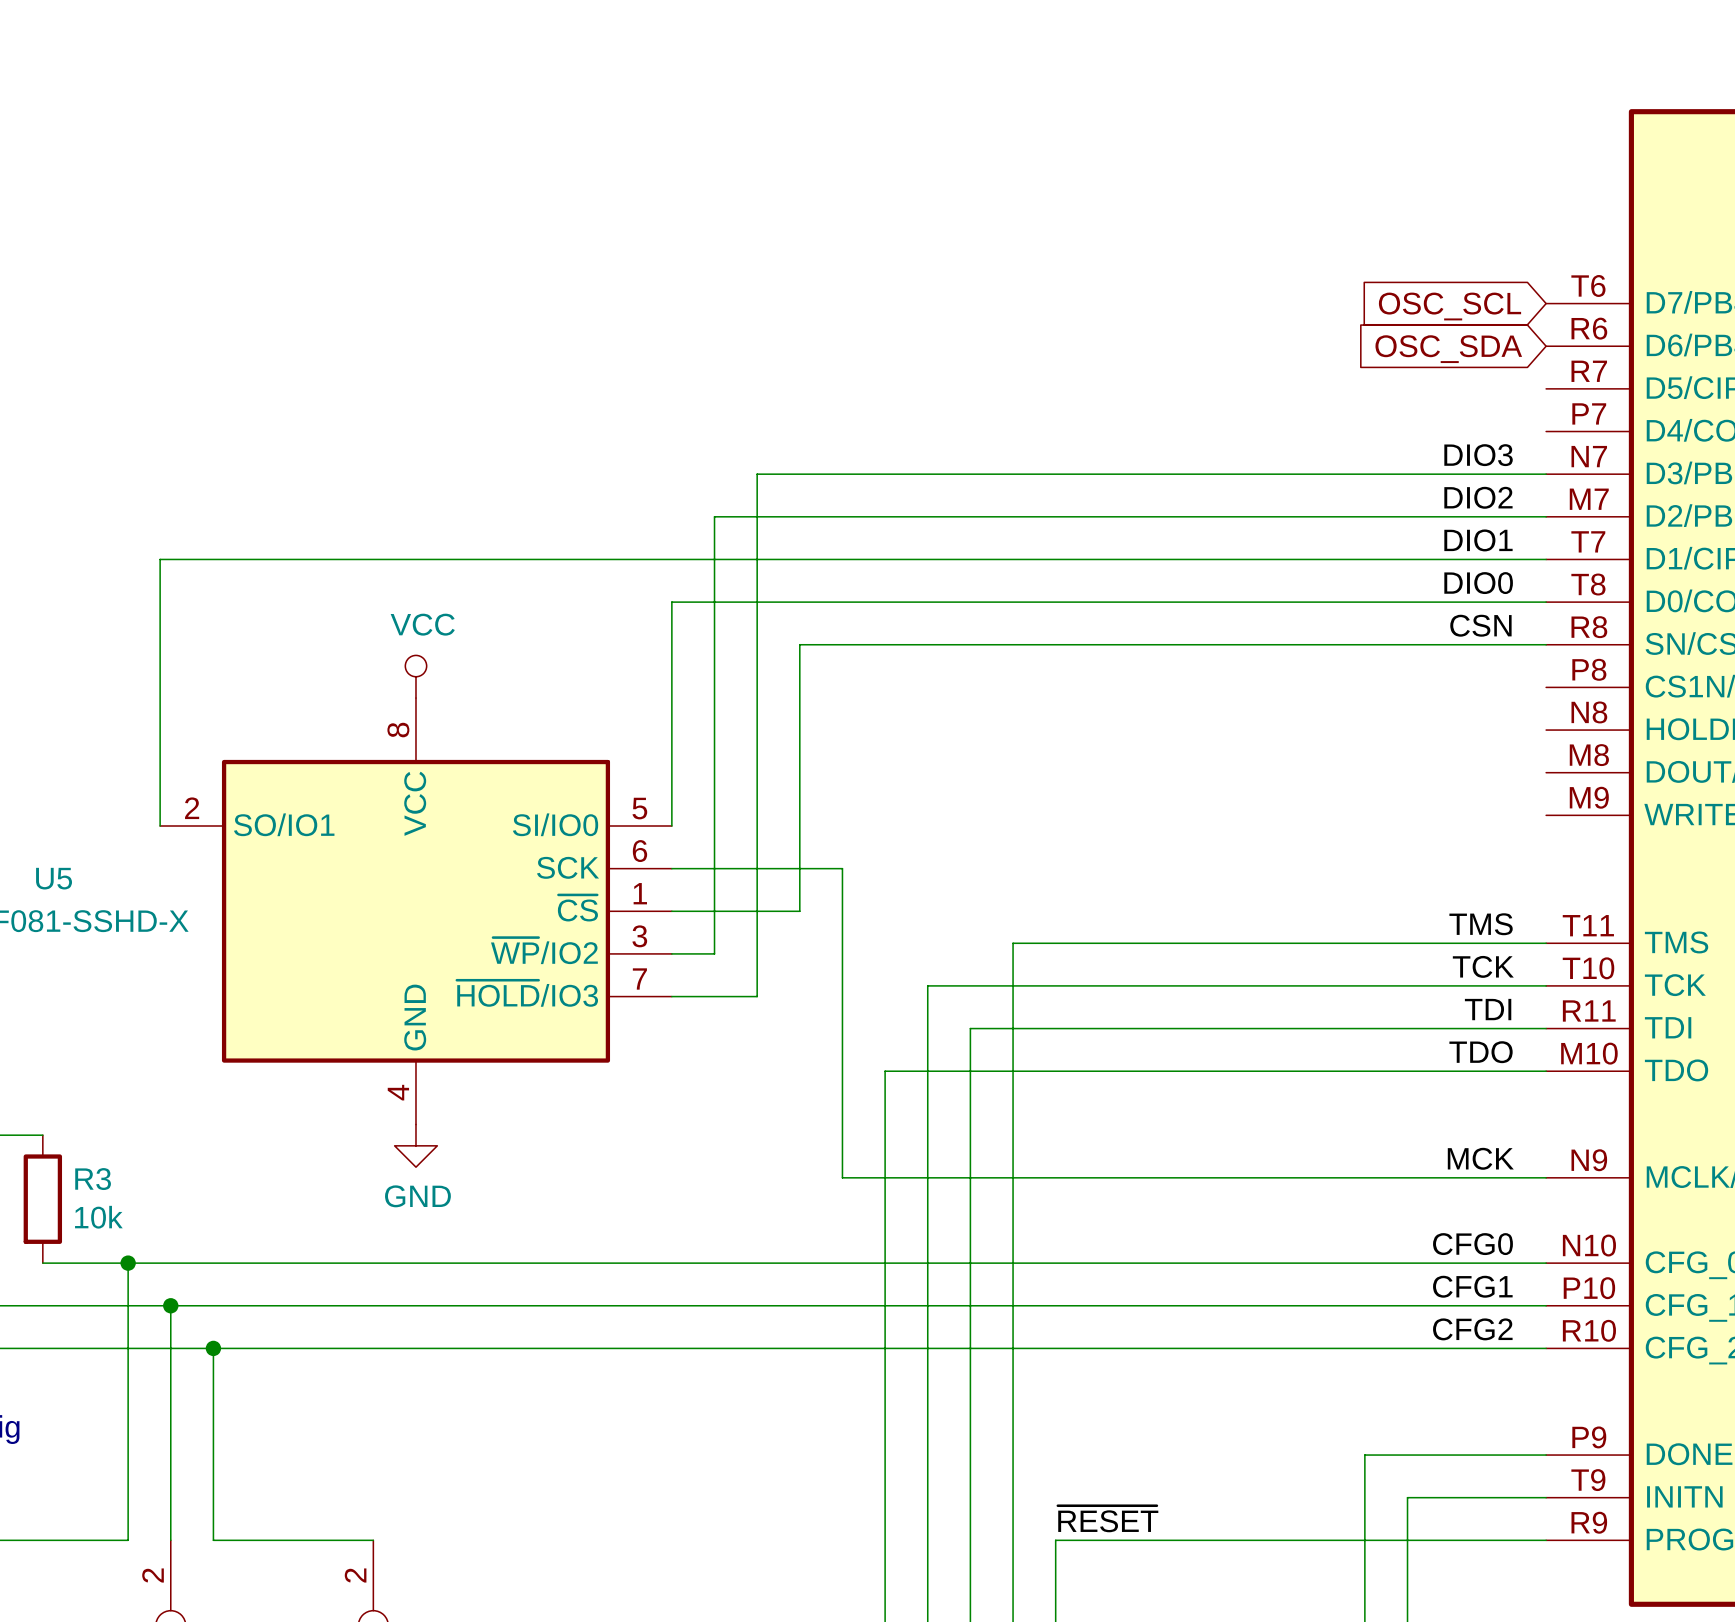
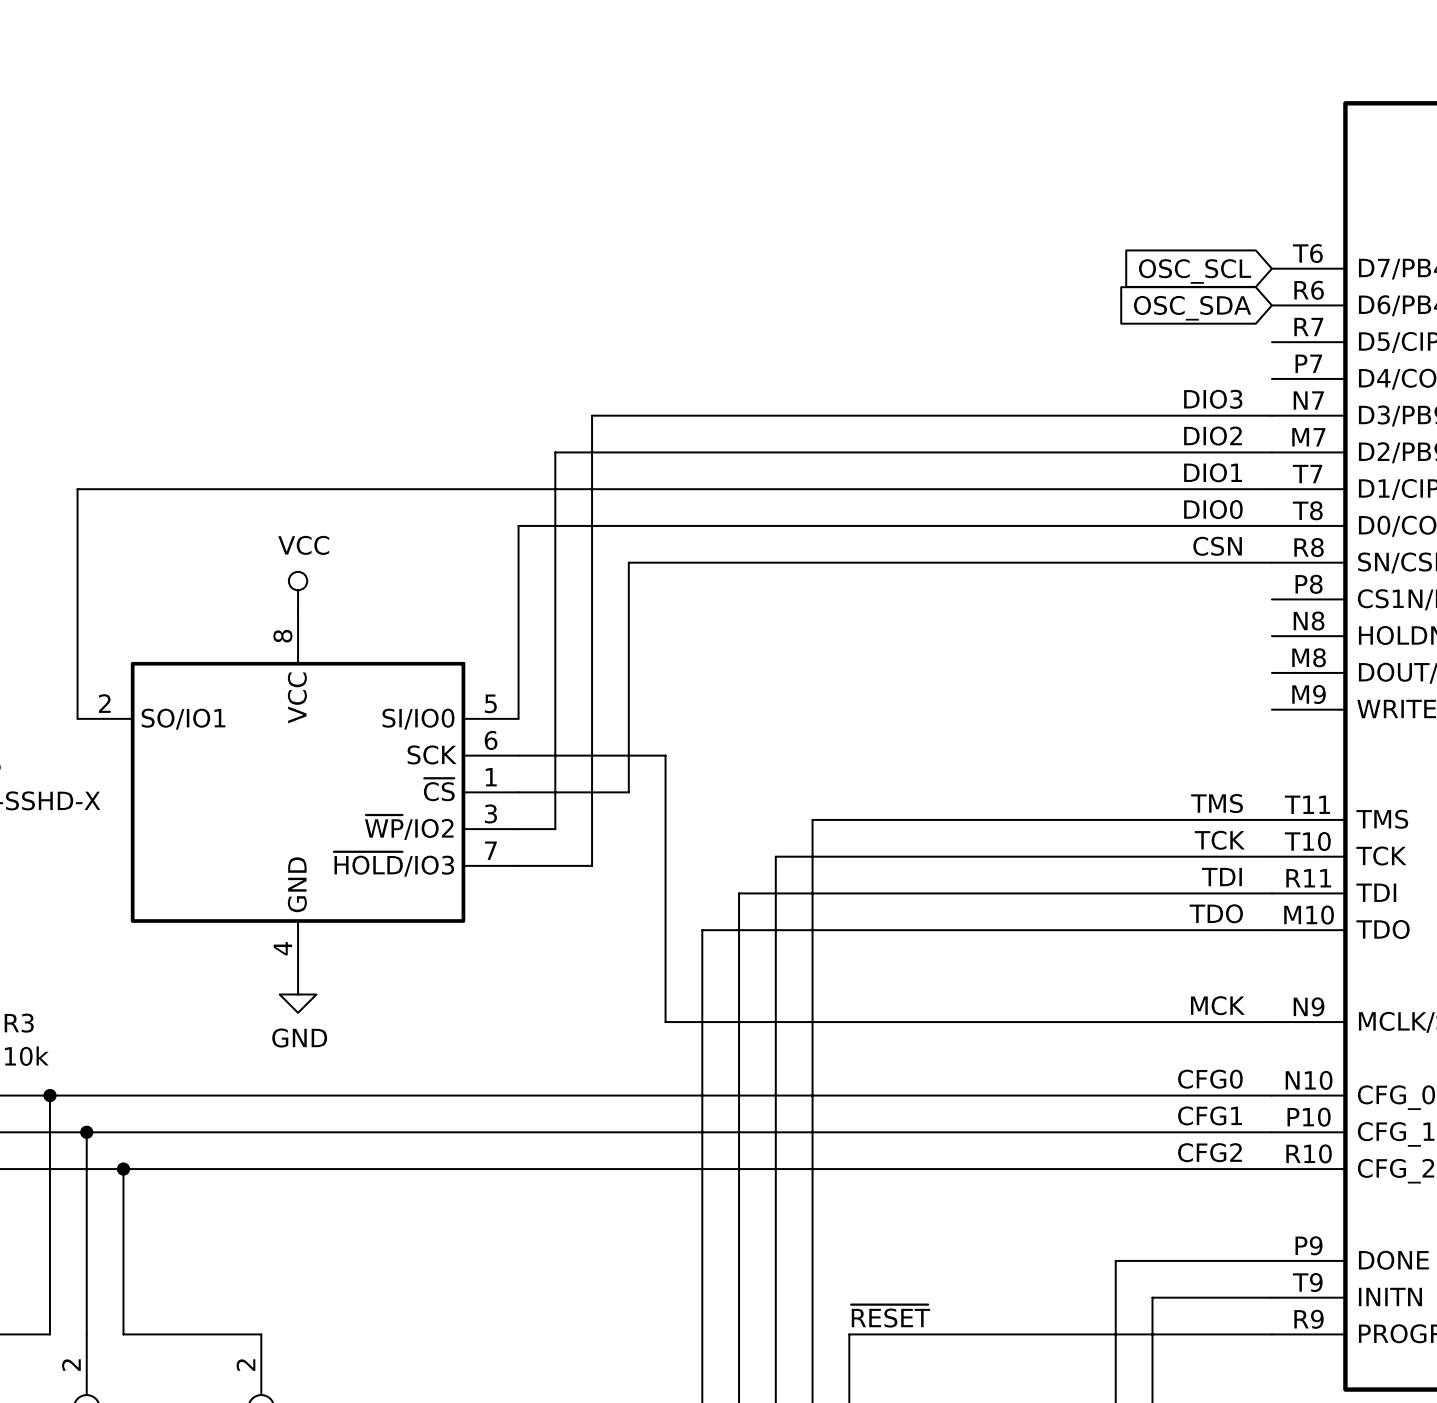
wire: (970, 985) (927, 985) (927, 1028) -> (775, 856) (775, 893) (739, 893)

